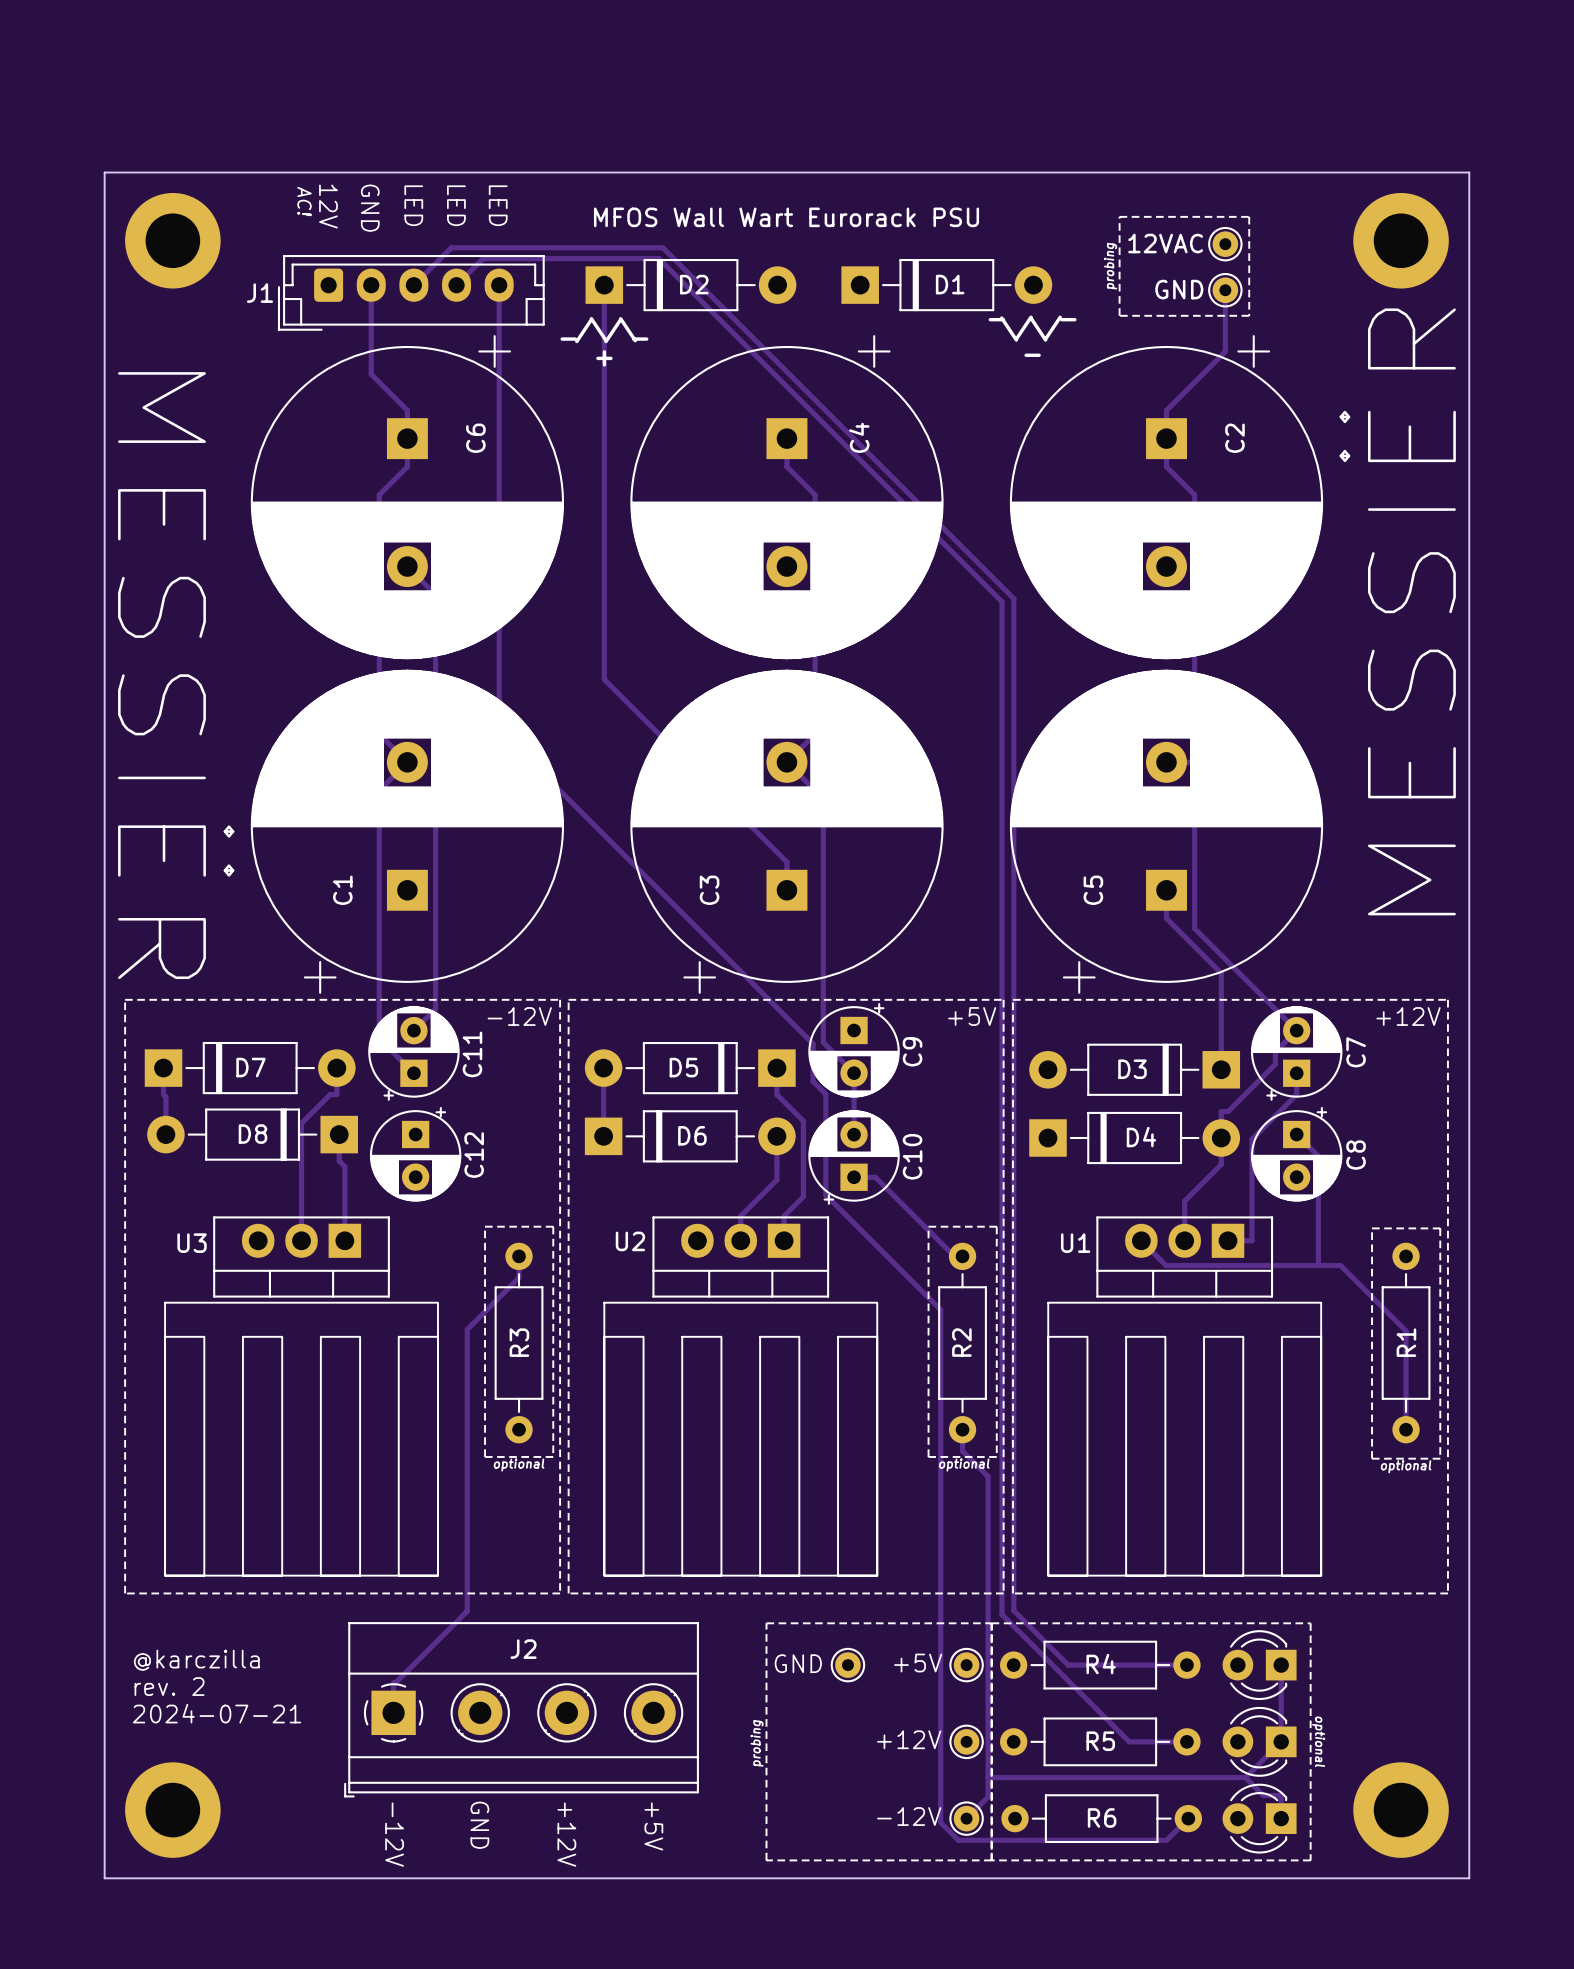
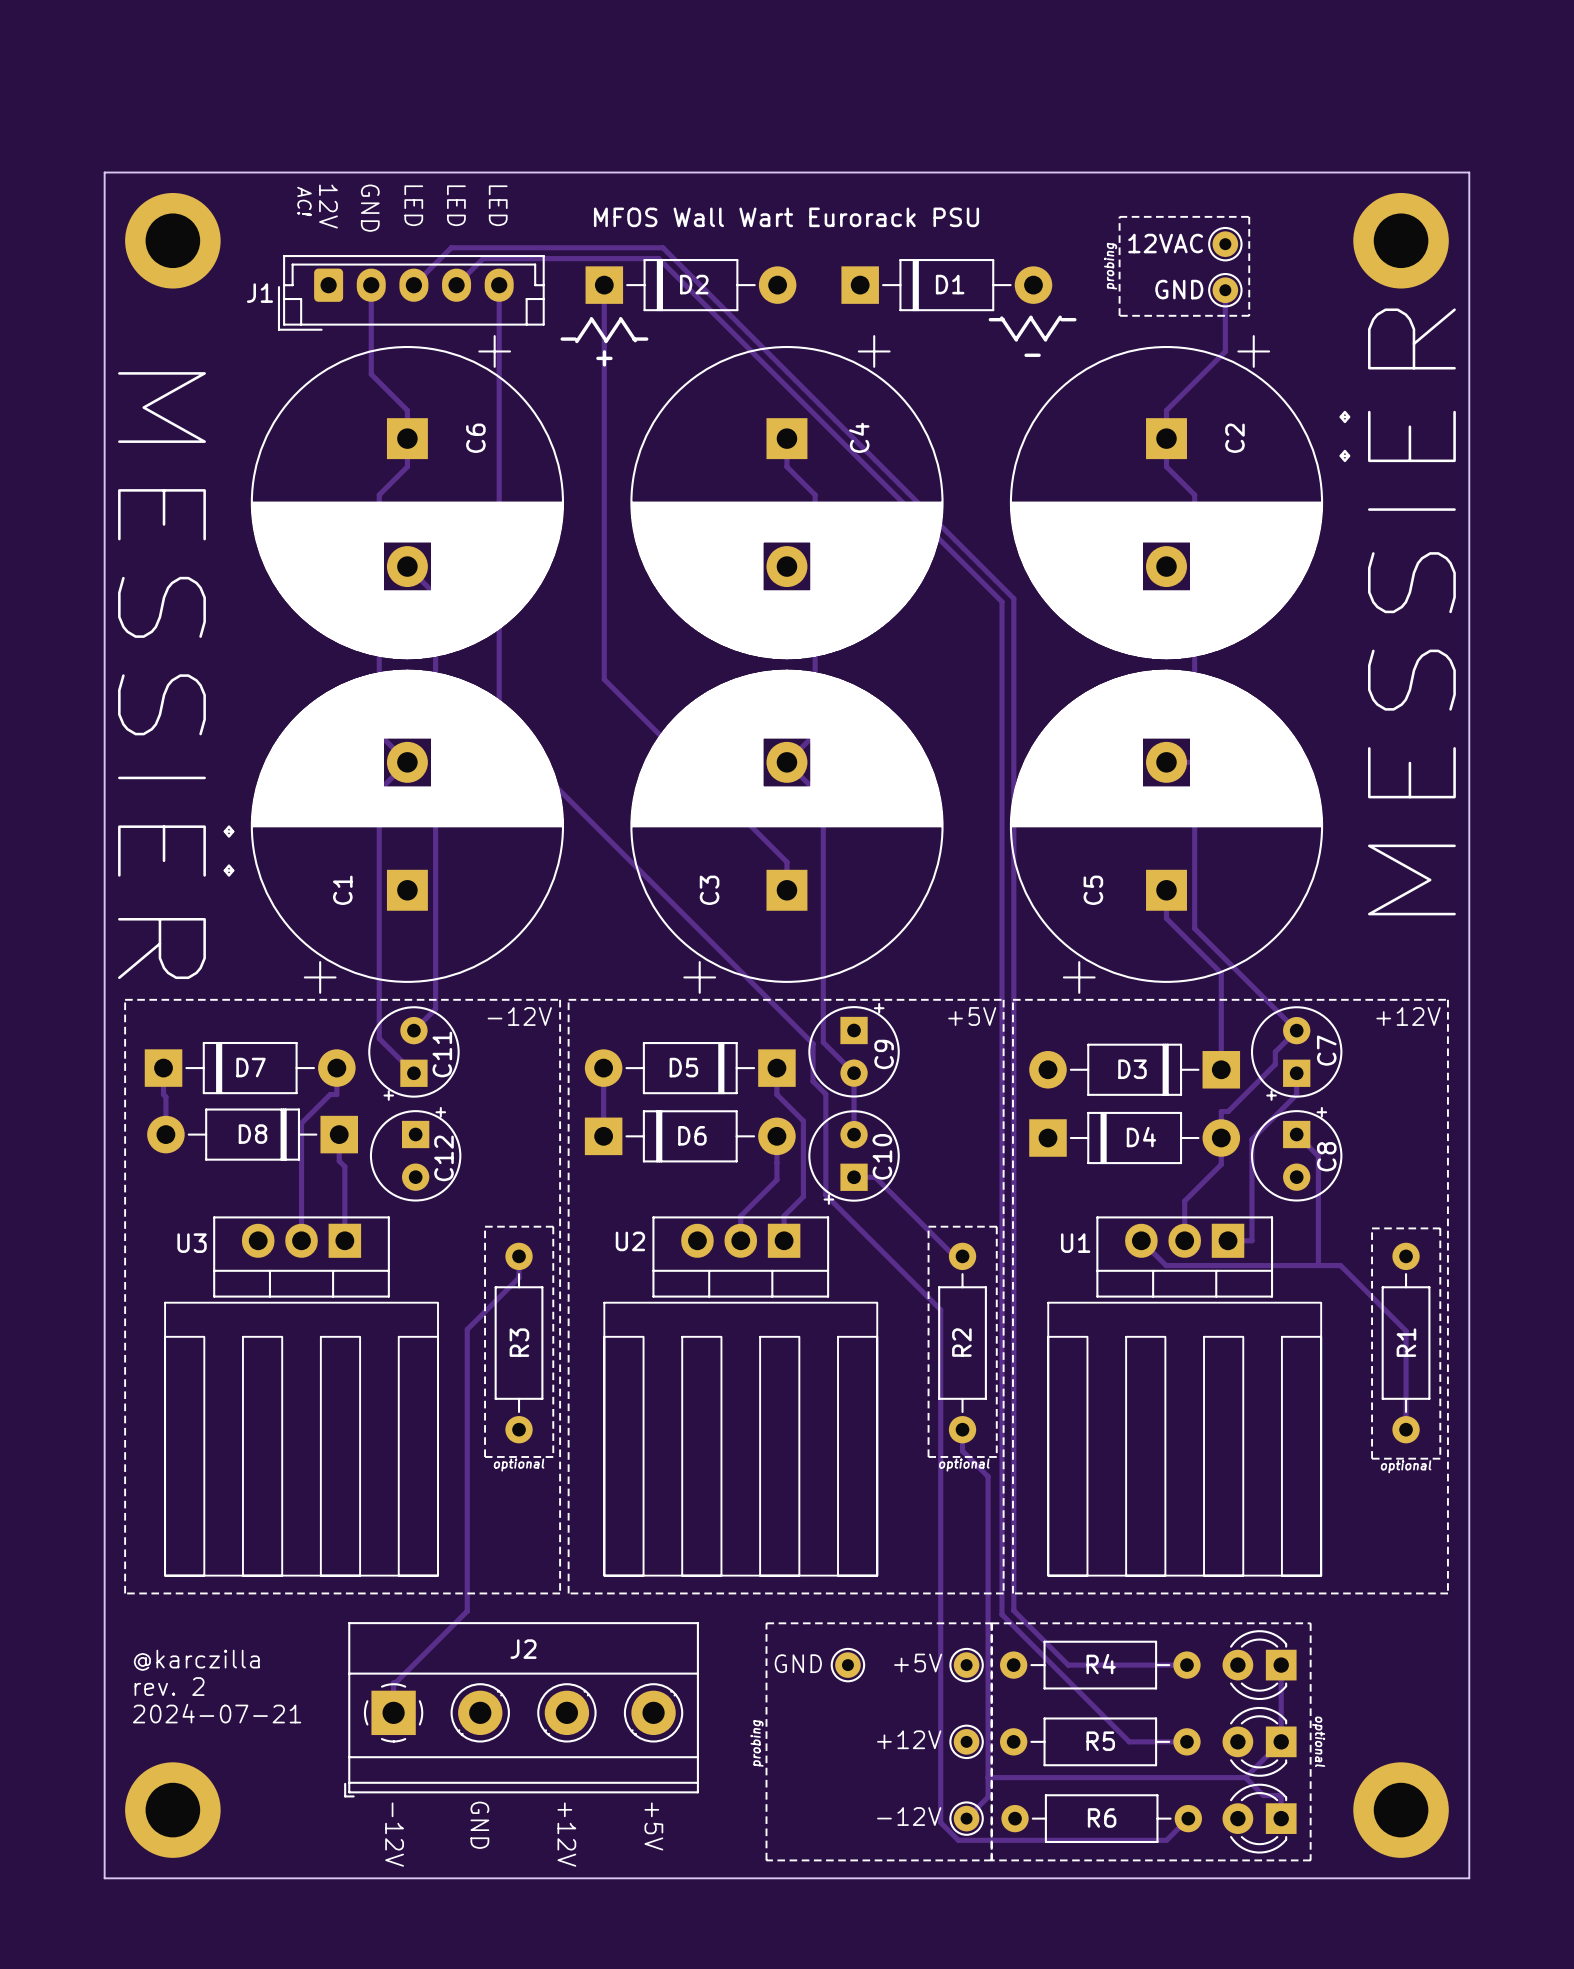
C9 footprint: [808, 1002, 900, 1098] -> [808, 1002, 900, 1098]
C11 footprint: [368, 1006, 460, 1101] -> [368, 1006, 460, 1101]
C7 footprint: [1250, 1006, 1343, 1101] -> [1250, 1006, 1343, 1101]
C12 footprint: [369, 1106, 462, 1202] -> [369, 1106, 462, 1202]
C8 footprint: [1250, 1106, 1343, 1202] -> [1250, 1106, 1343, 1202]
C10 footprint: [808, 1110, 900, 1205] -> [808, 1110, 900, 1205]

